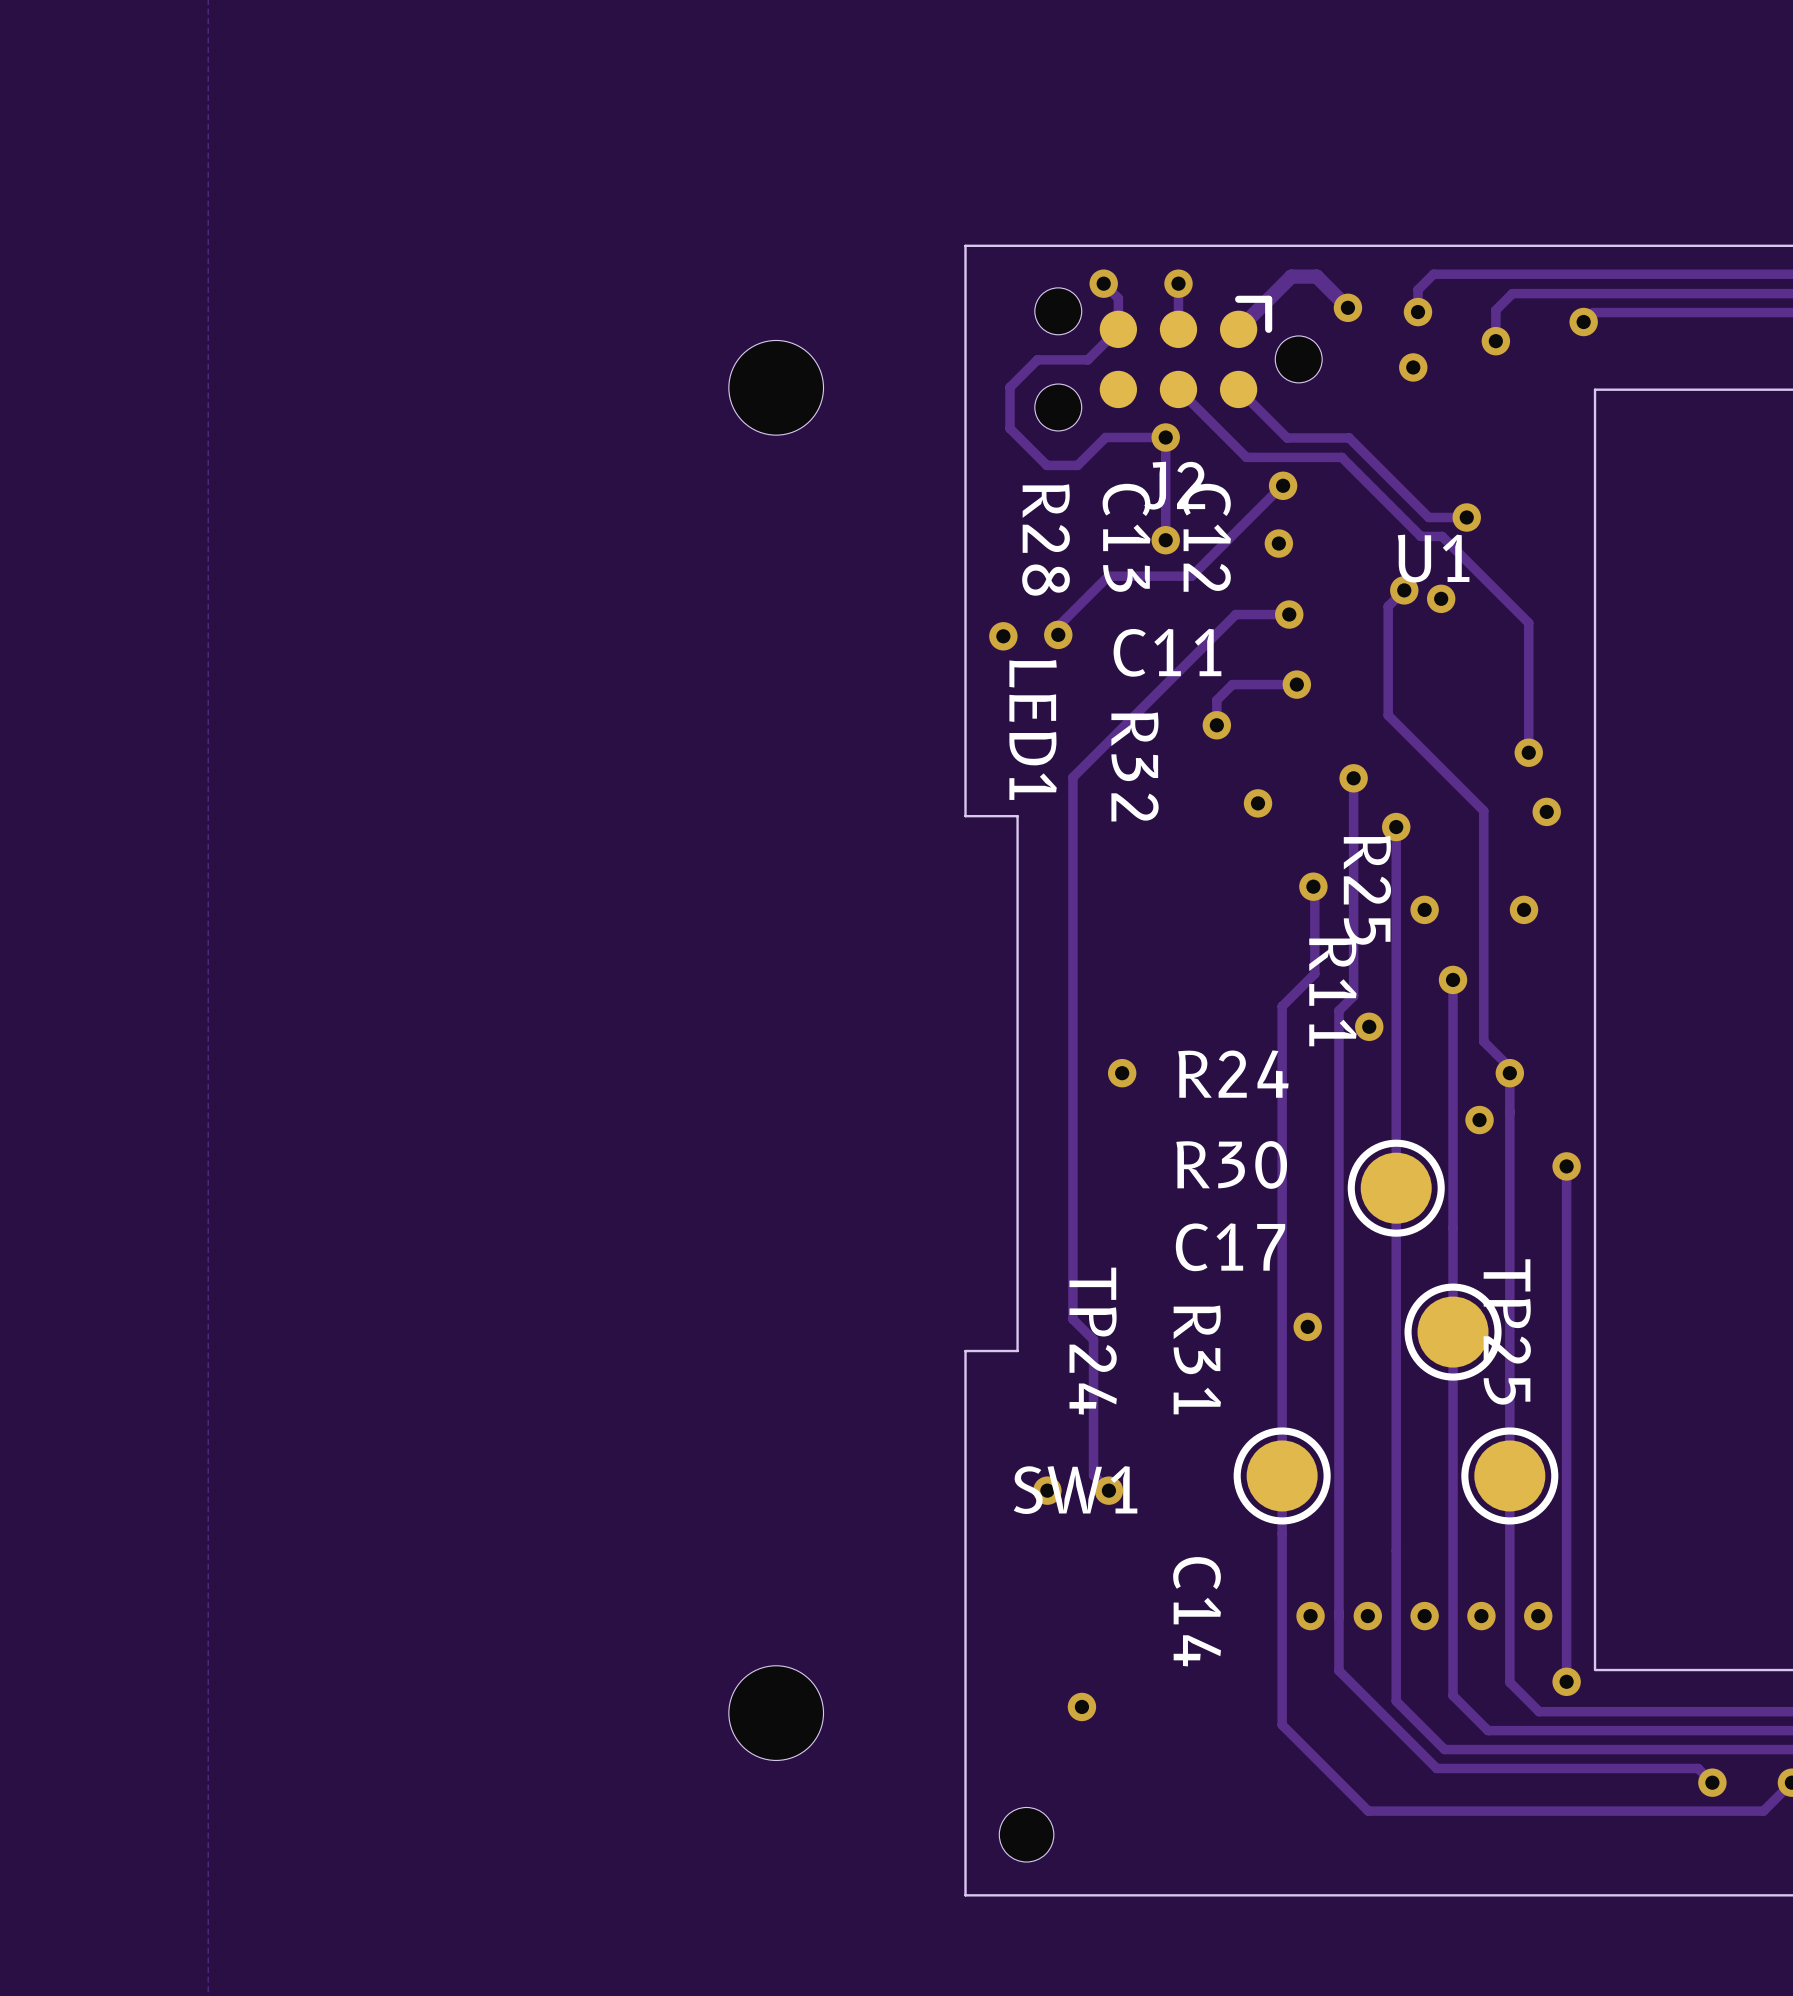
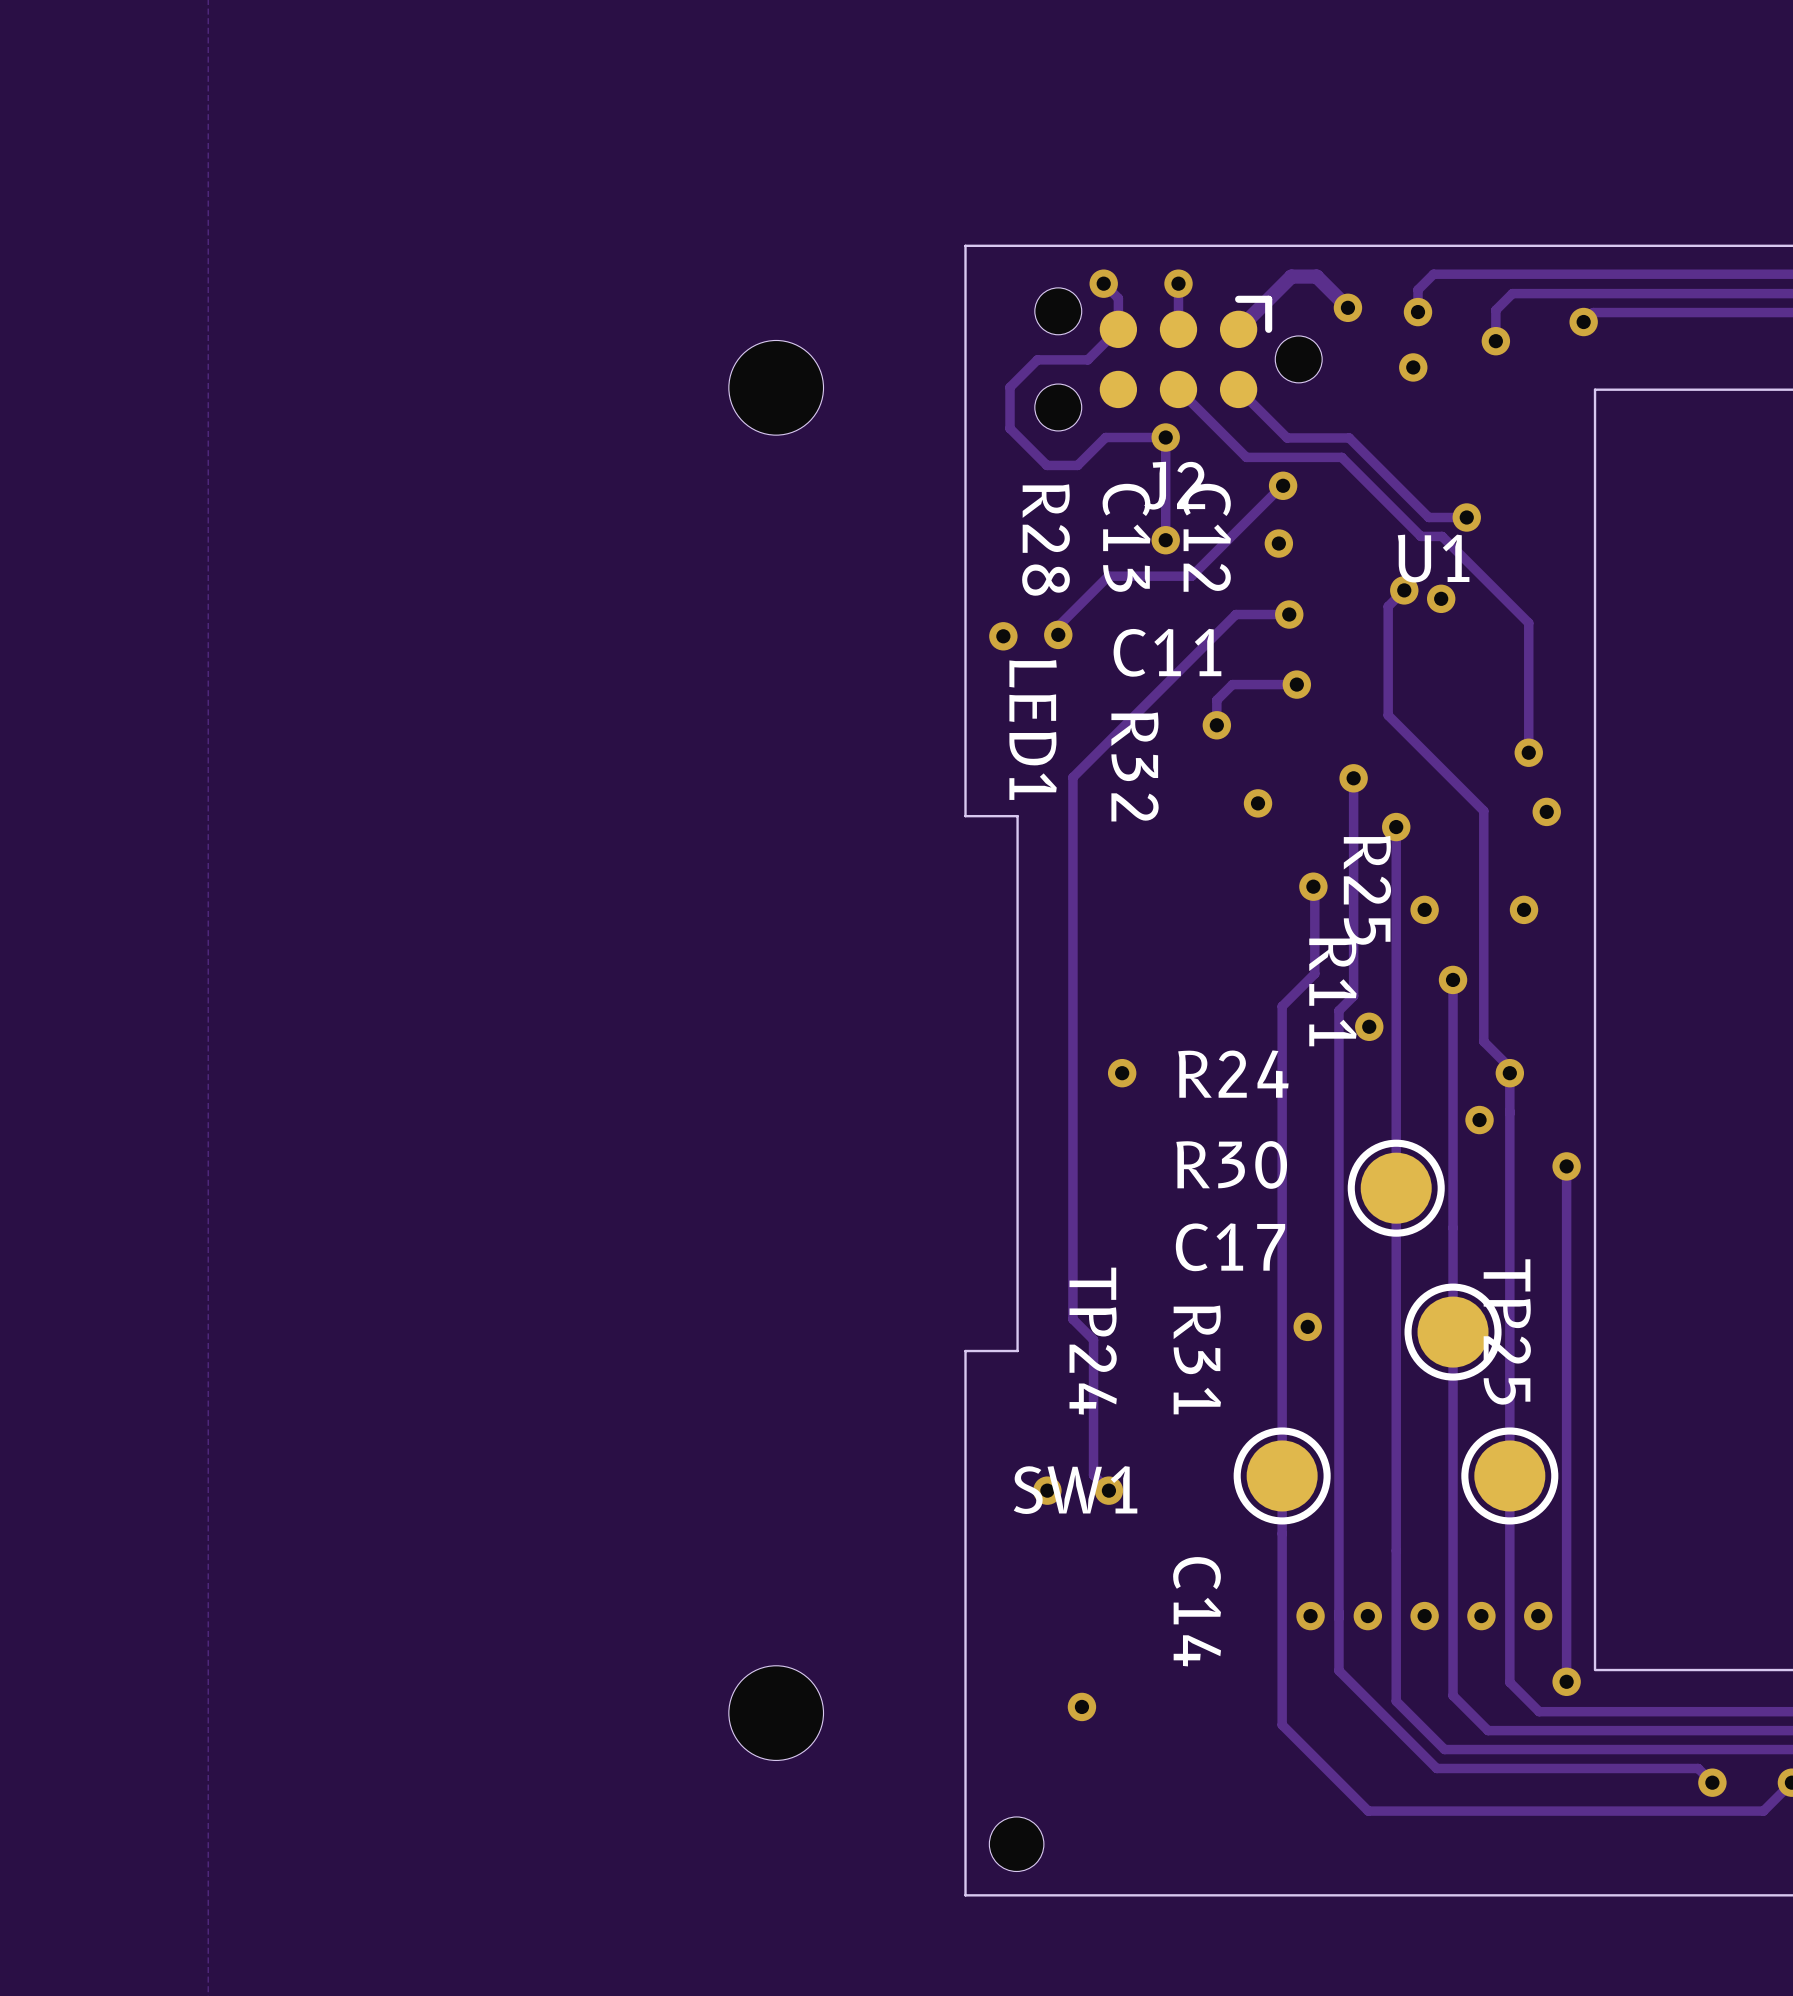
part position: (1026, 1834) -> (1016, 1844)

